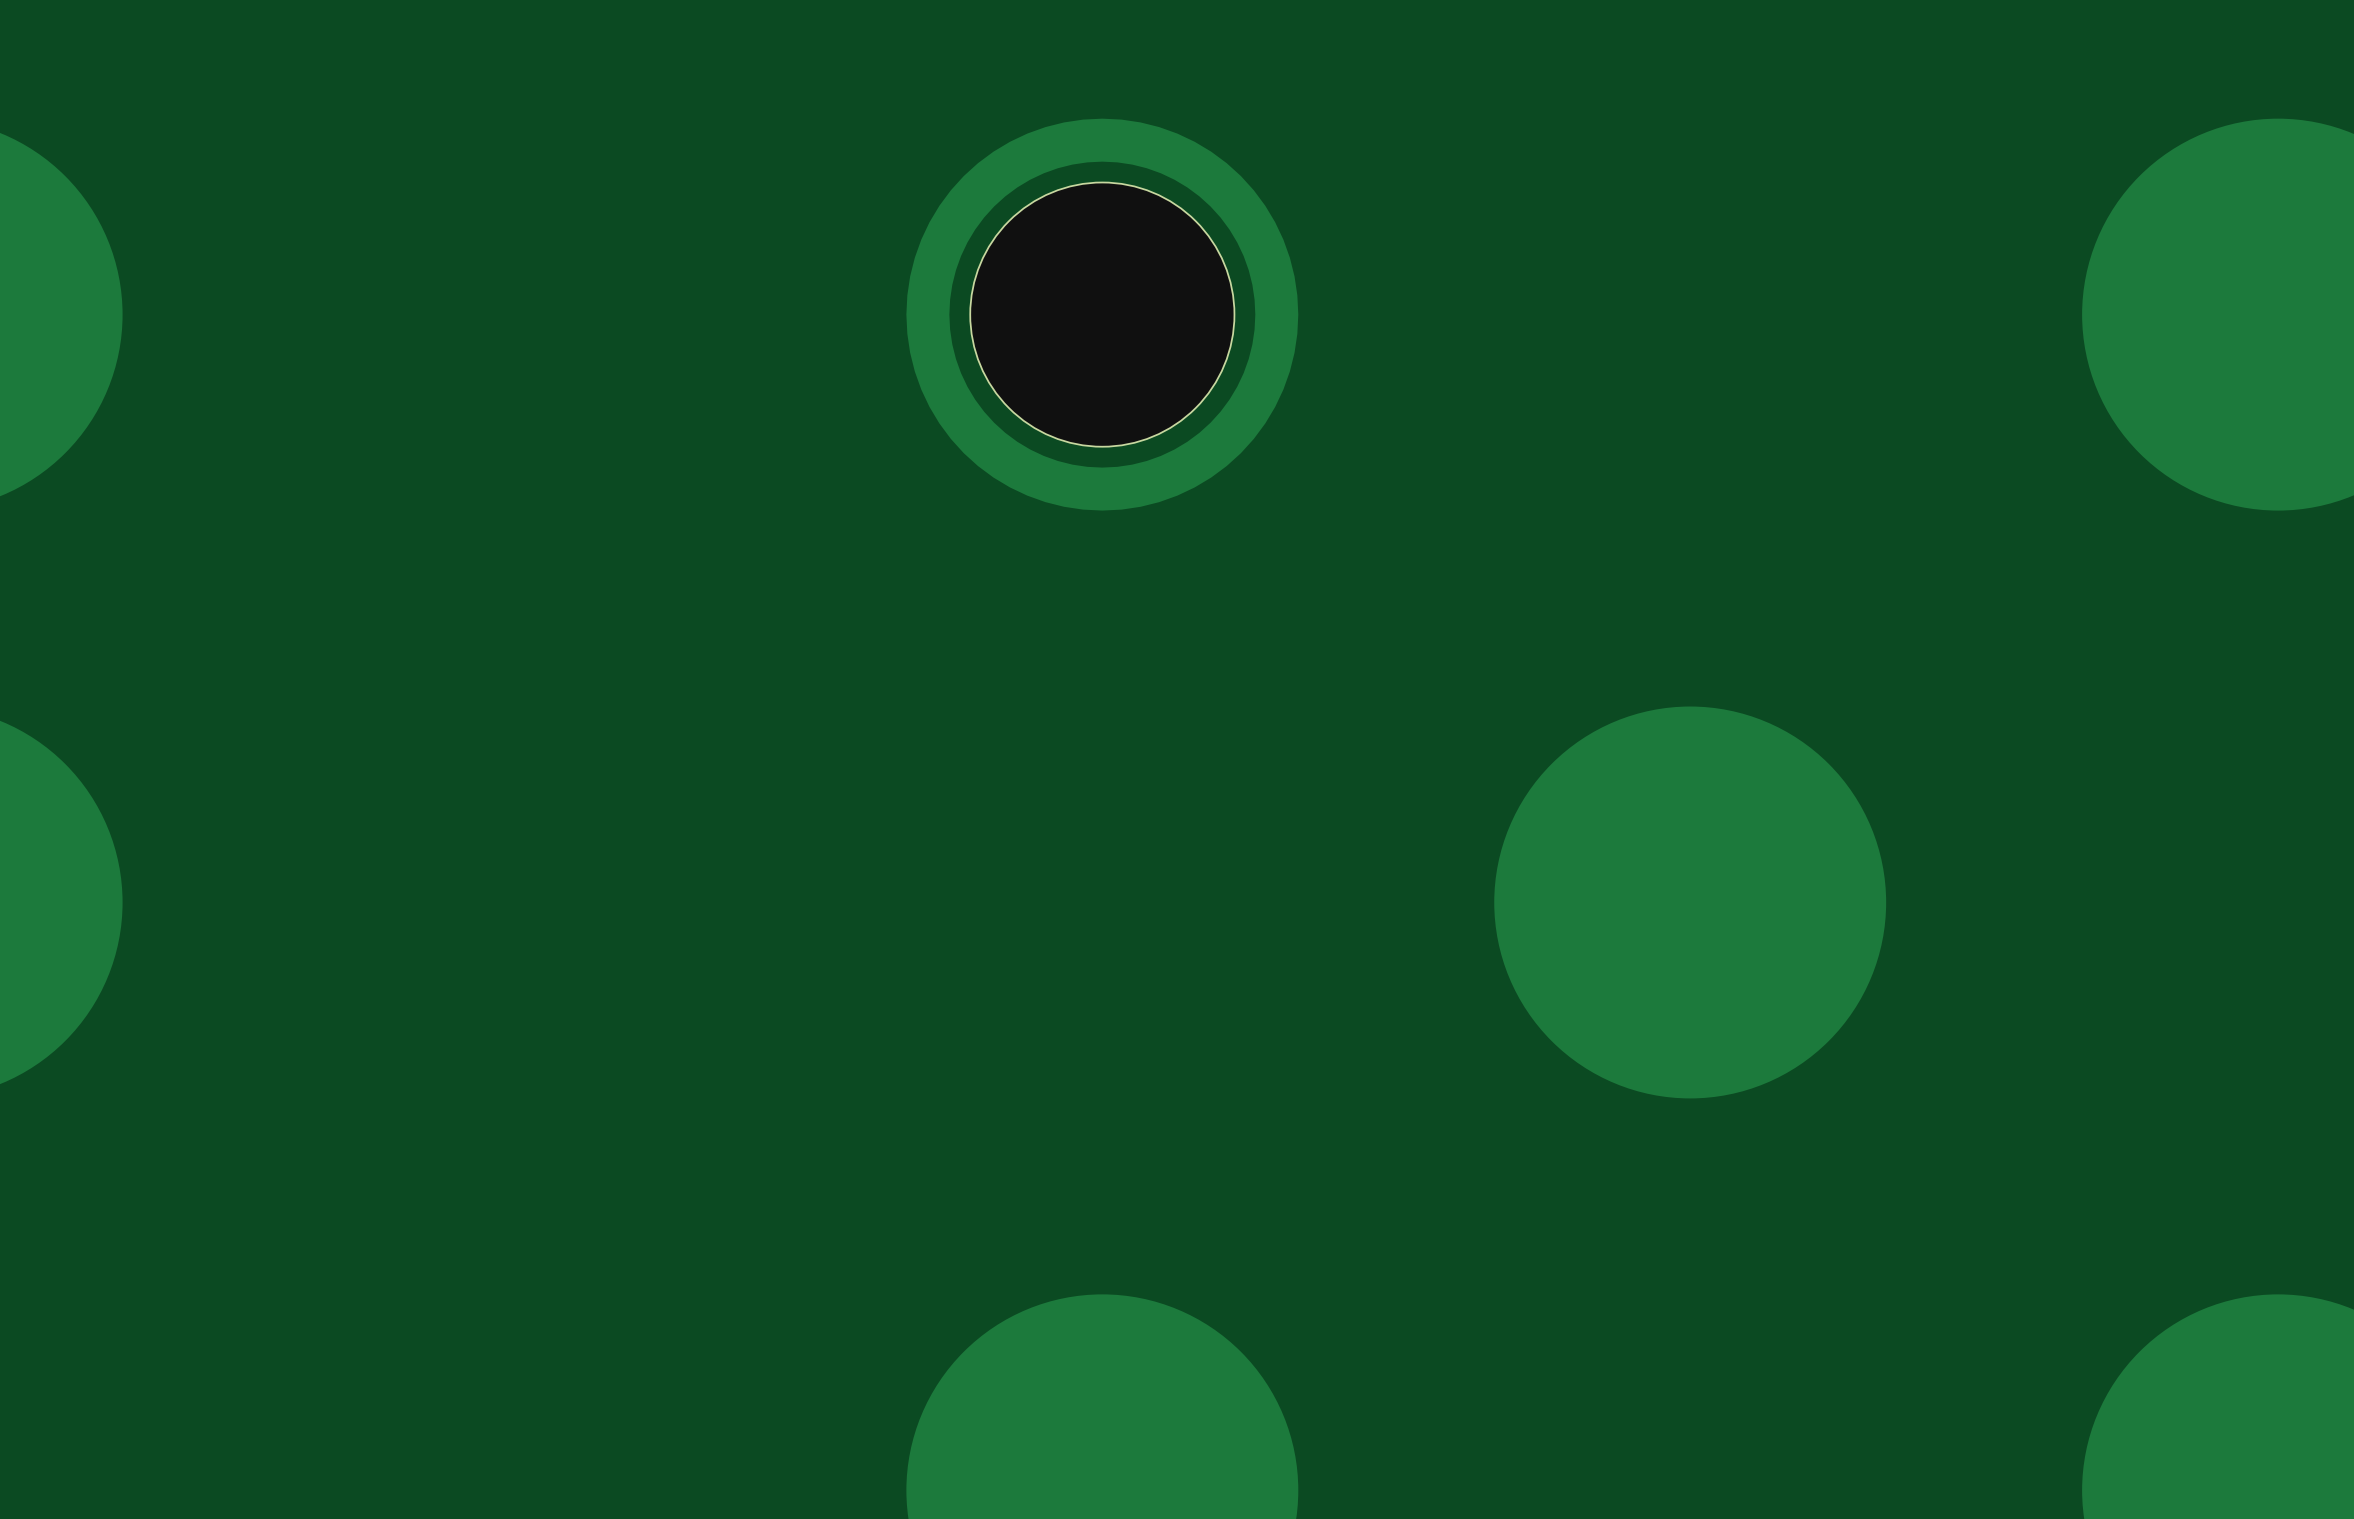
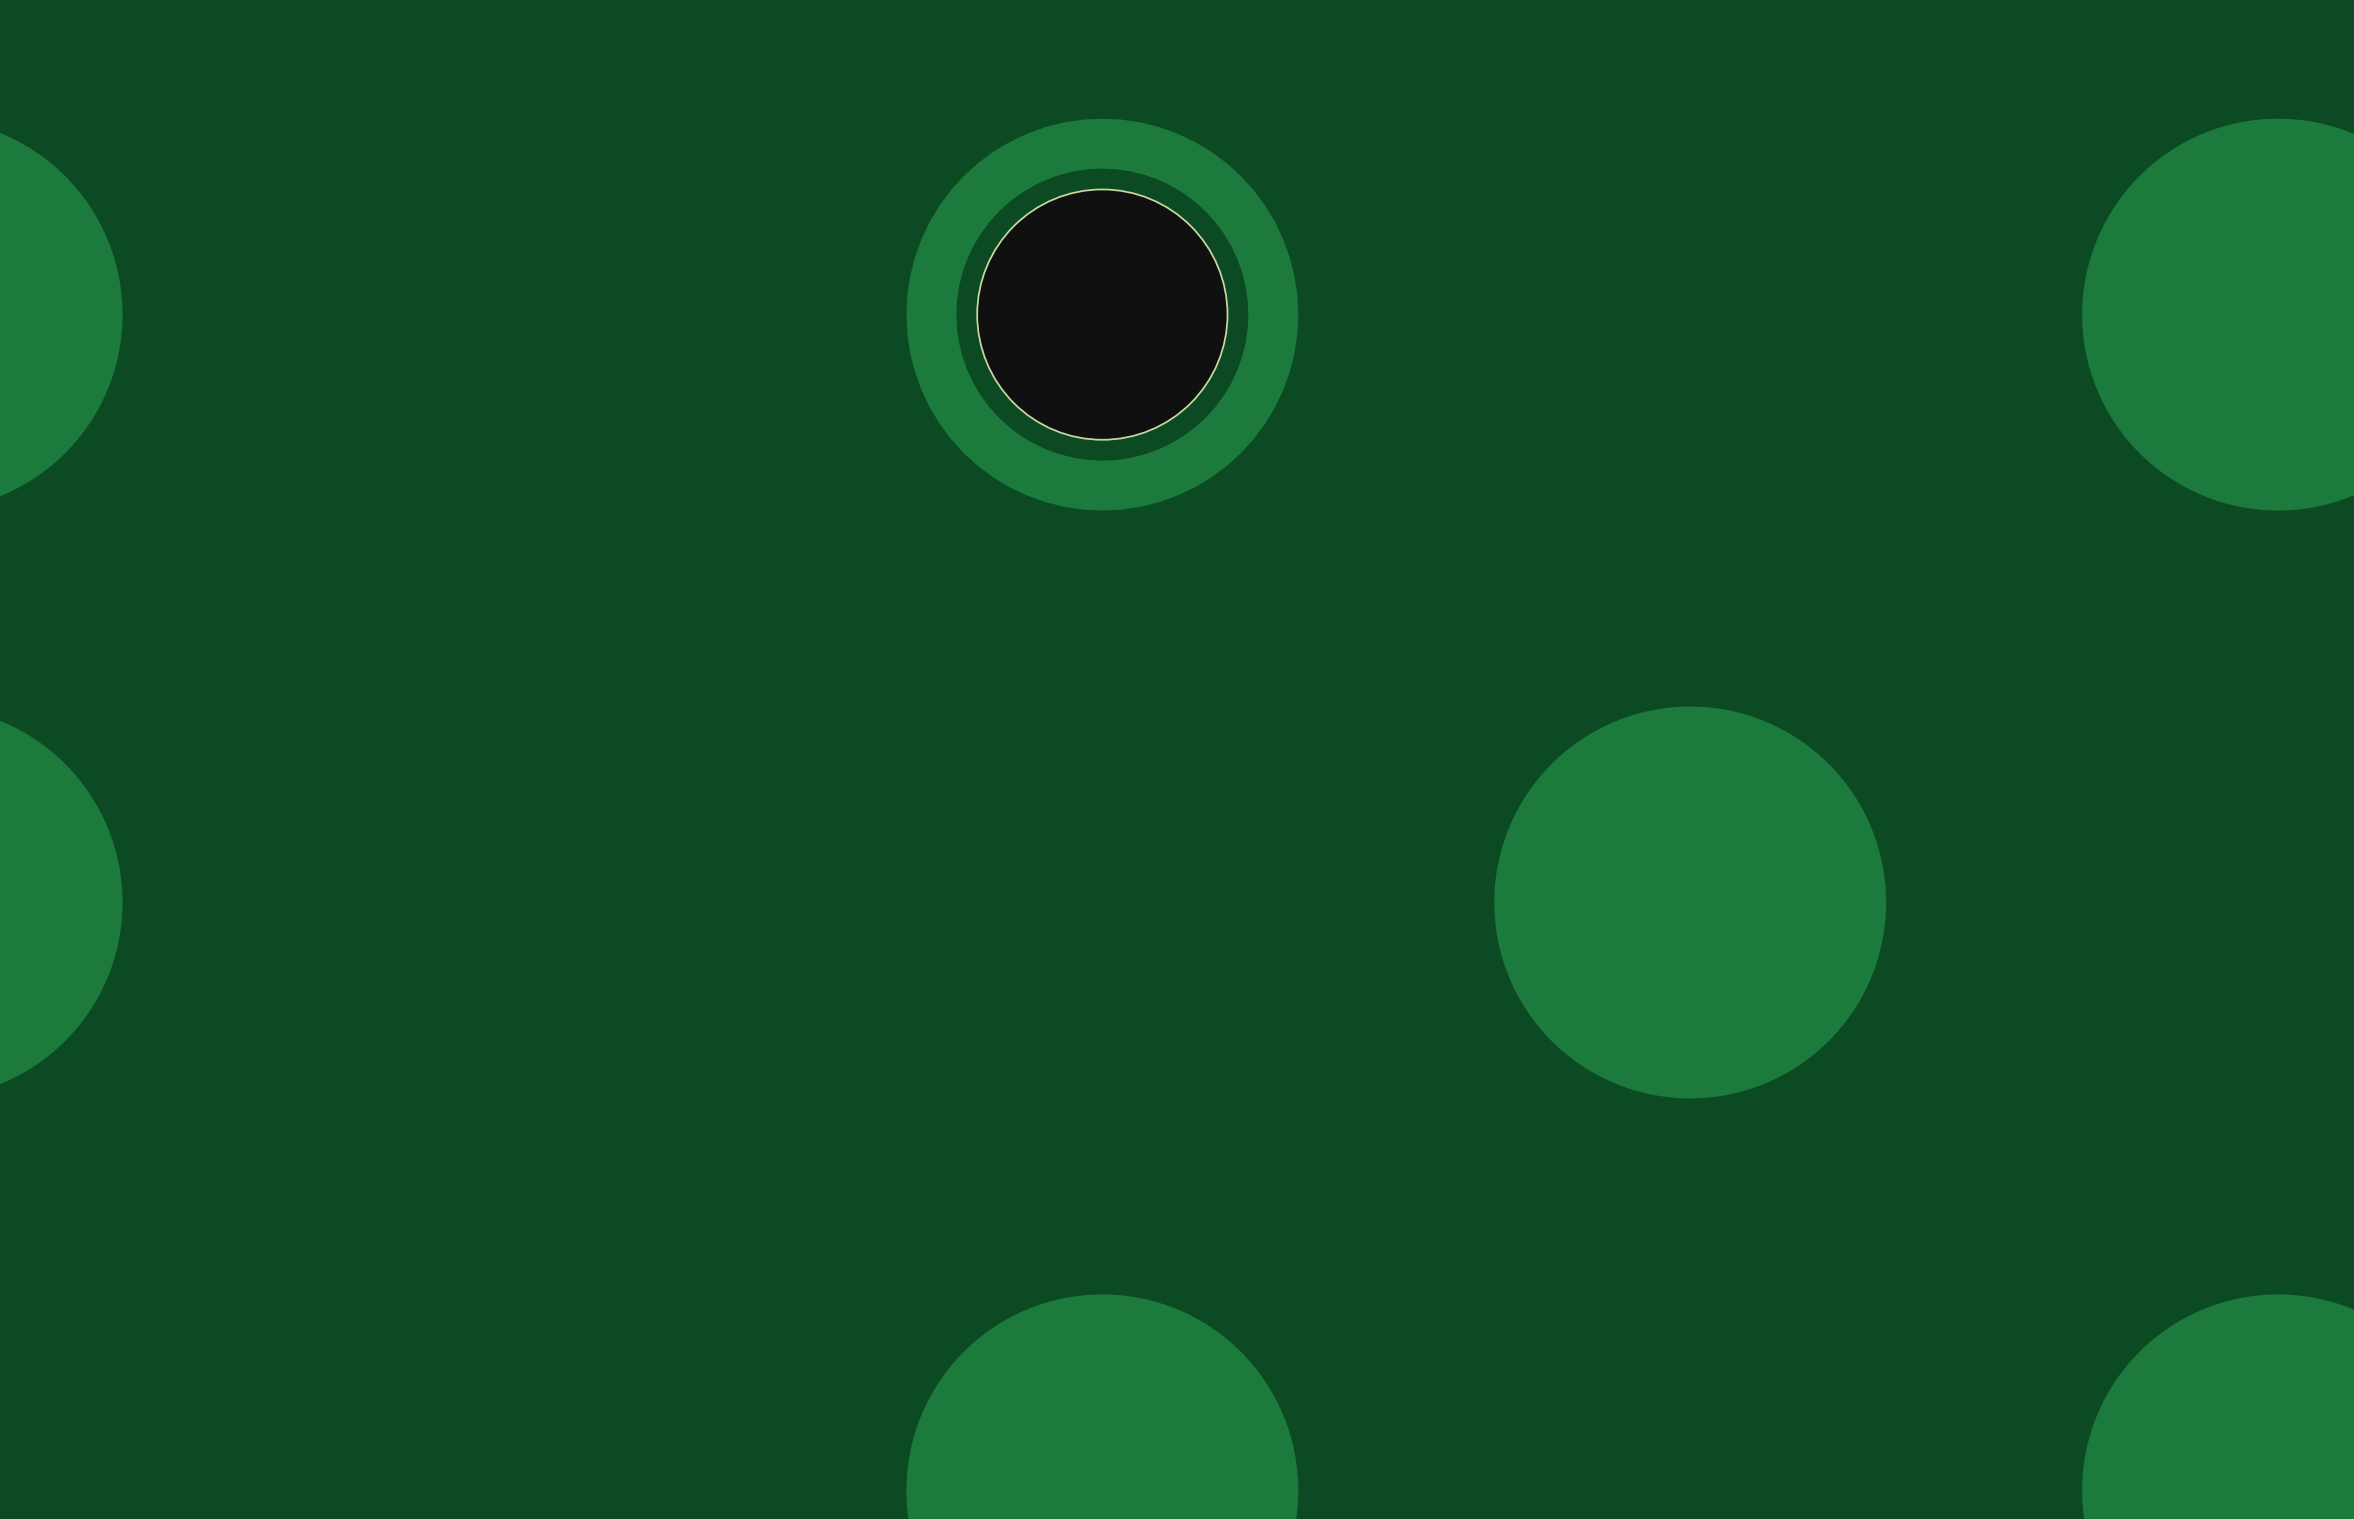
drawing shape: [906, 118, 1299, 511] -> [906, 118, 1299, 511]
part footprint: [970, 182, 1235, 447] -> [977, 189, 1228, 440]

